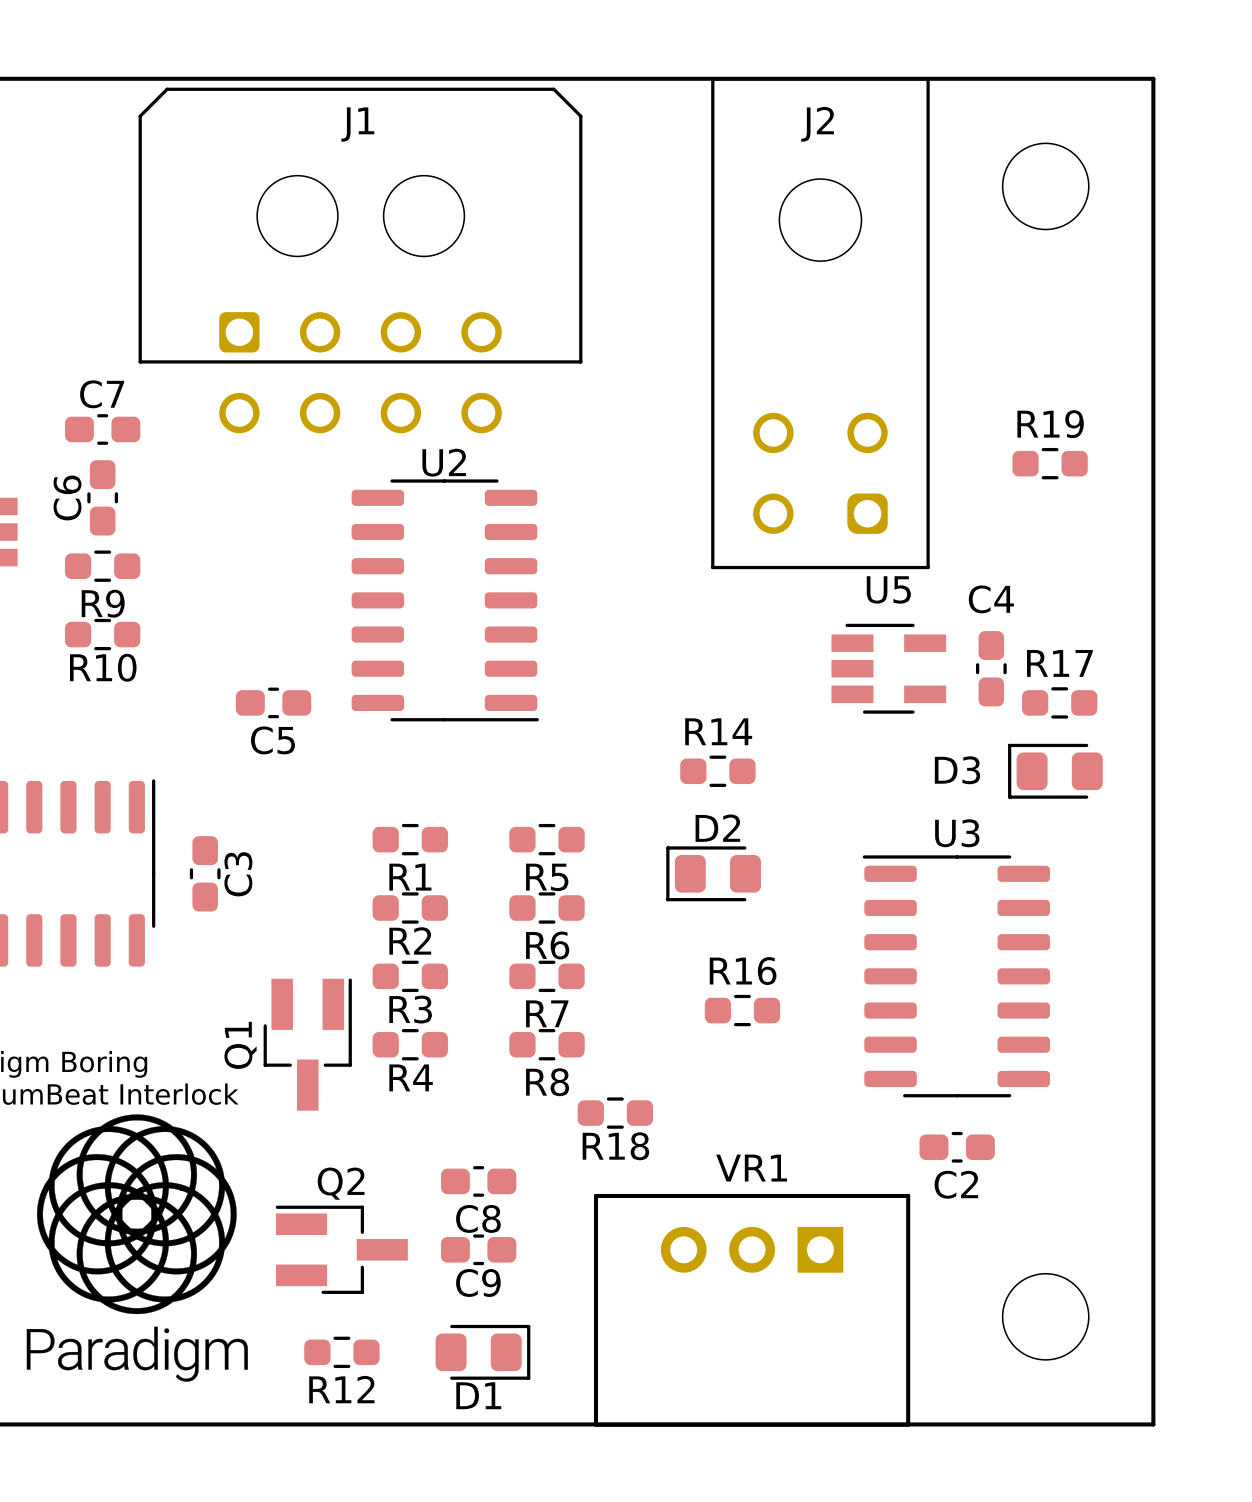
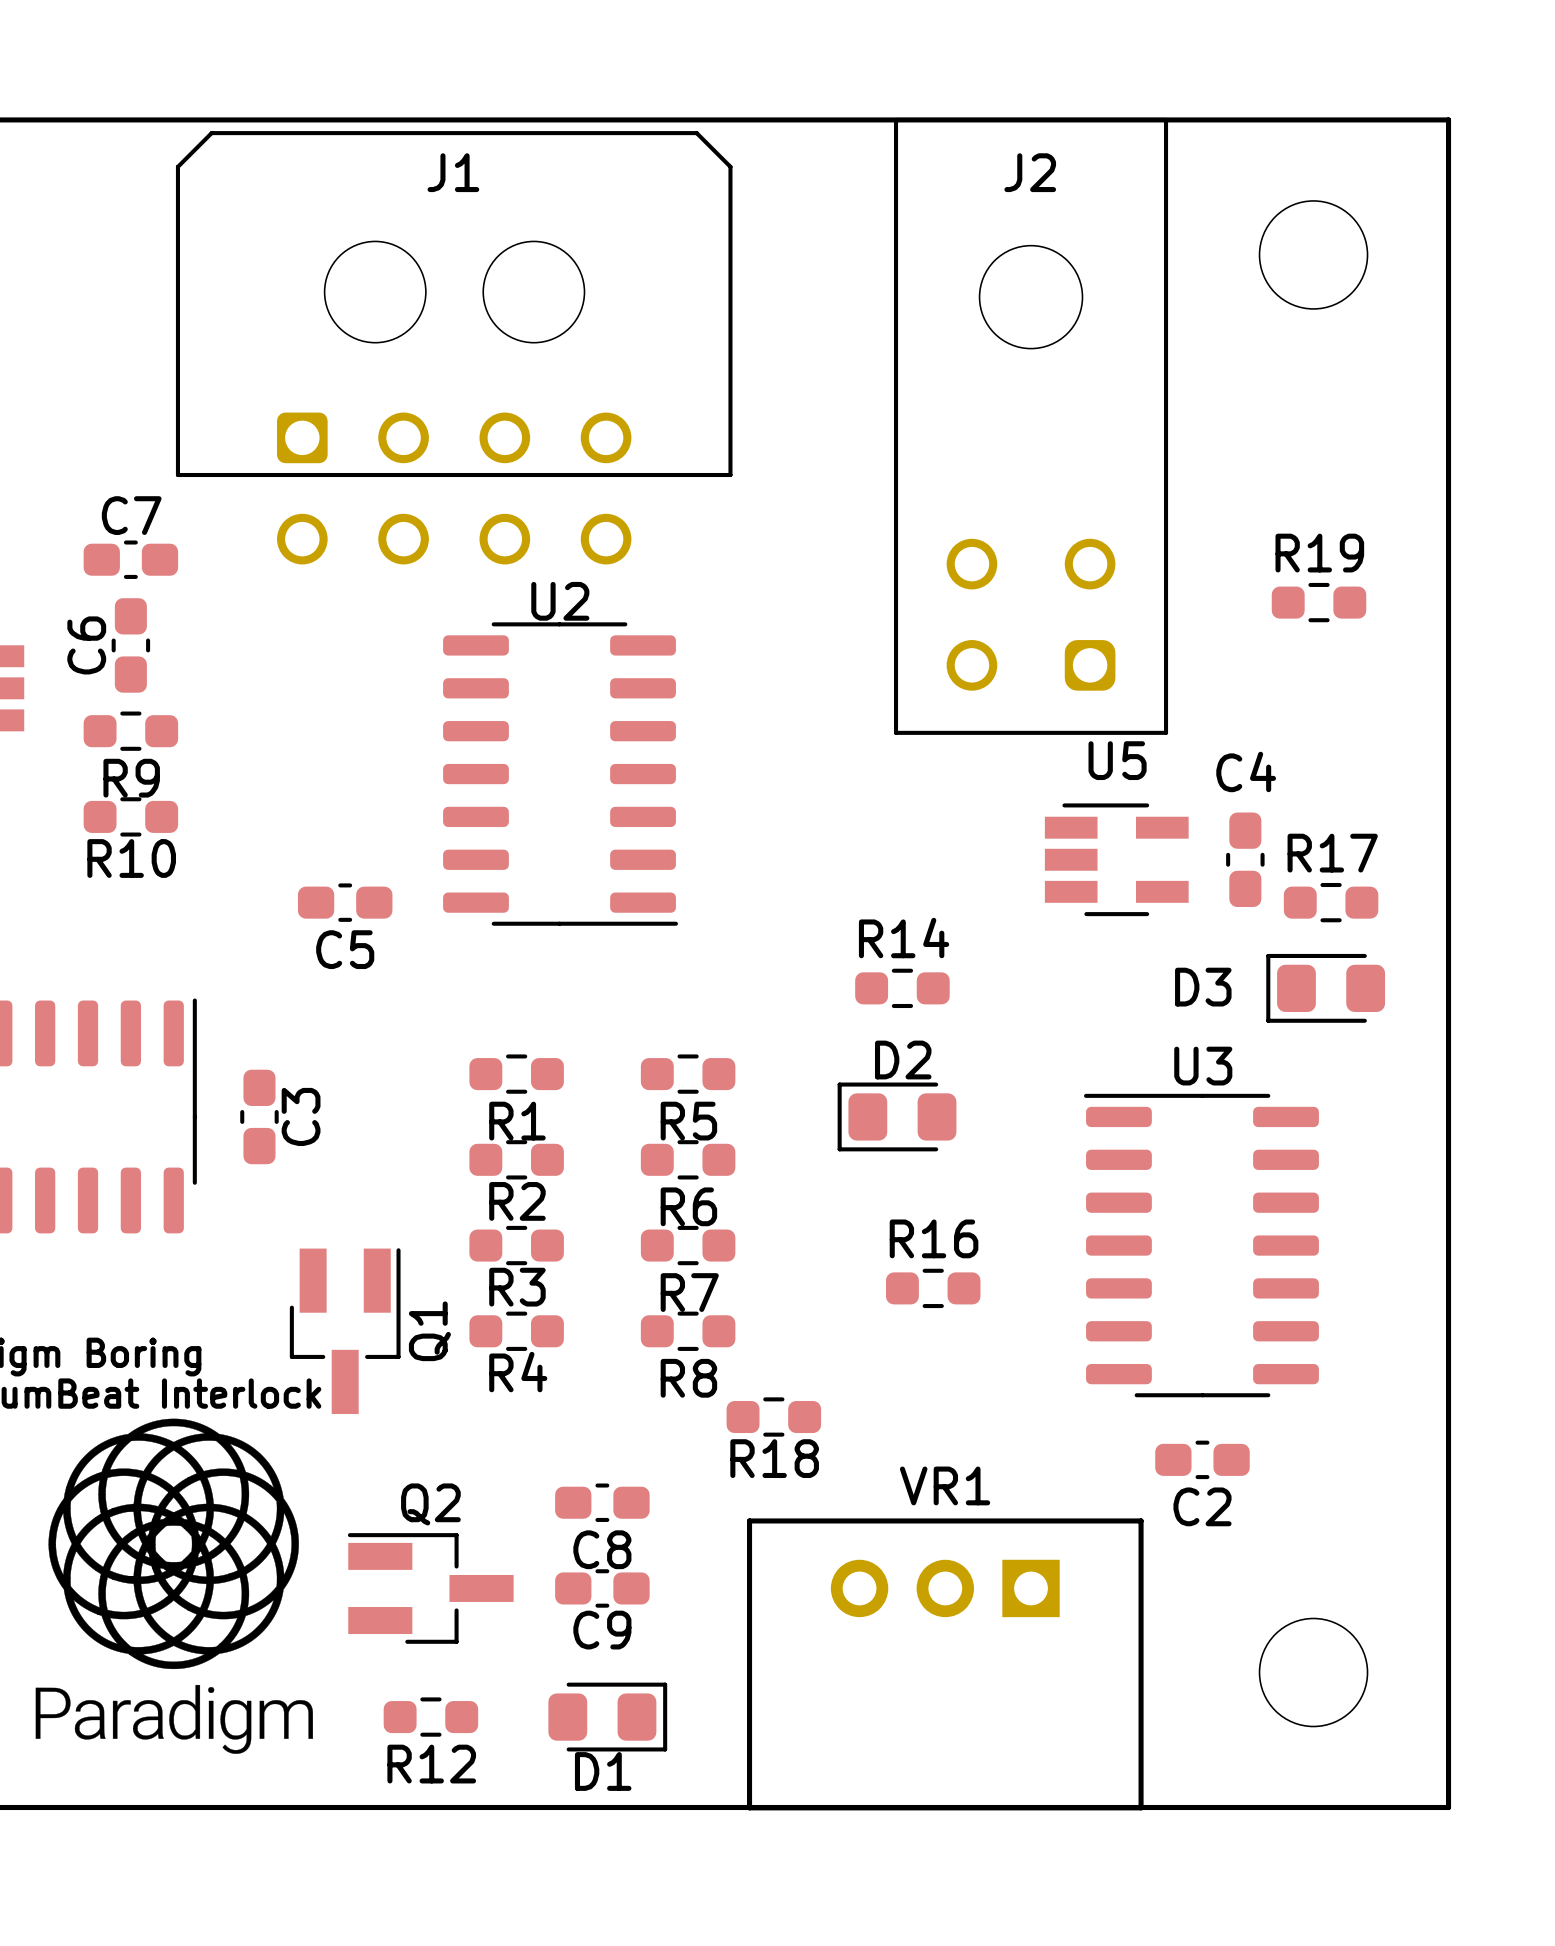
Q1 position: (307, 1044) -> (345, 1331)
Q1 name position: Q1 (240, 1045) -> Q1 (429, 1331)

